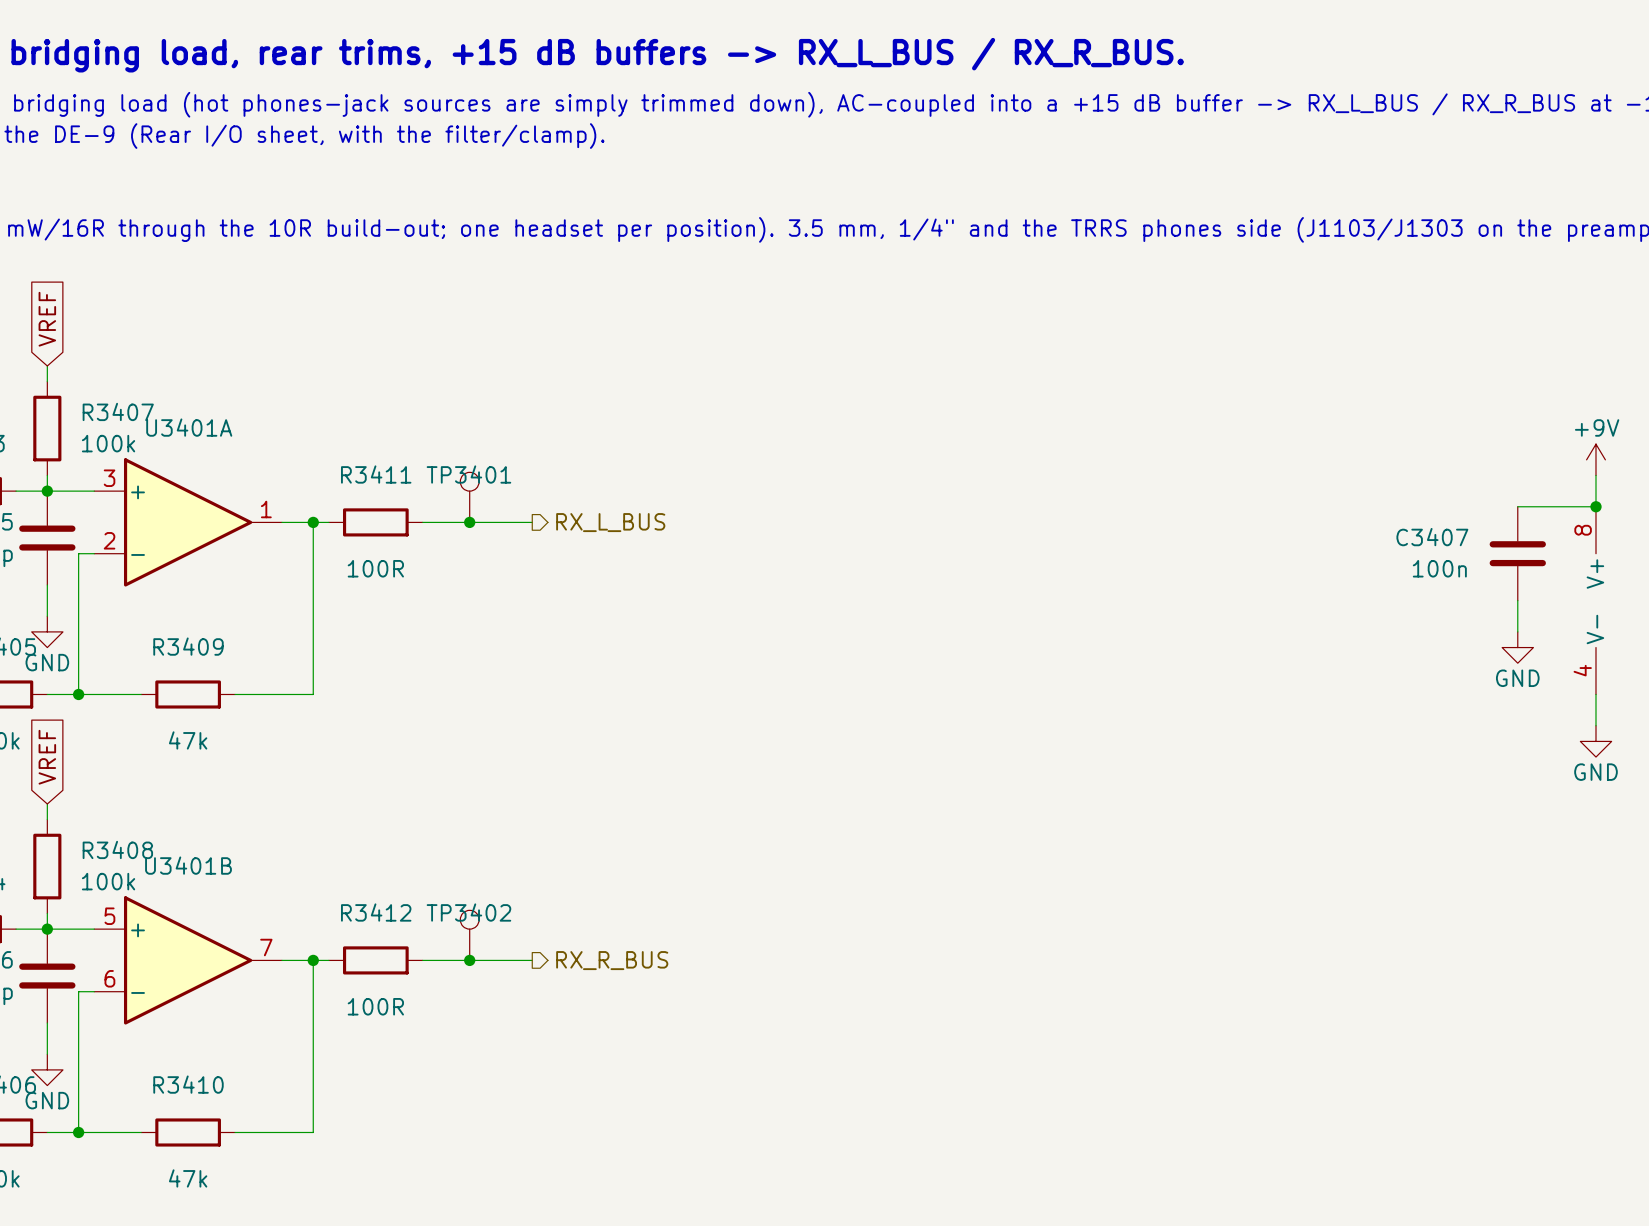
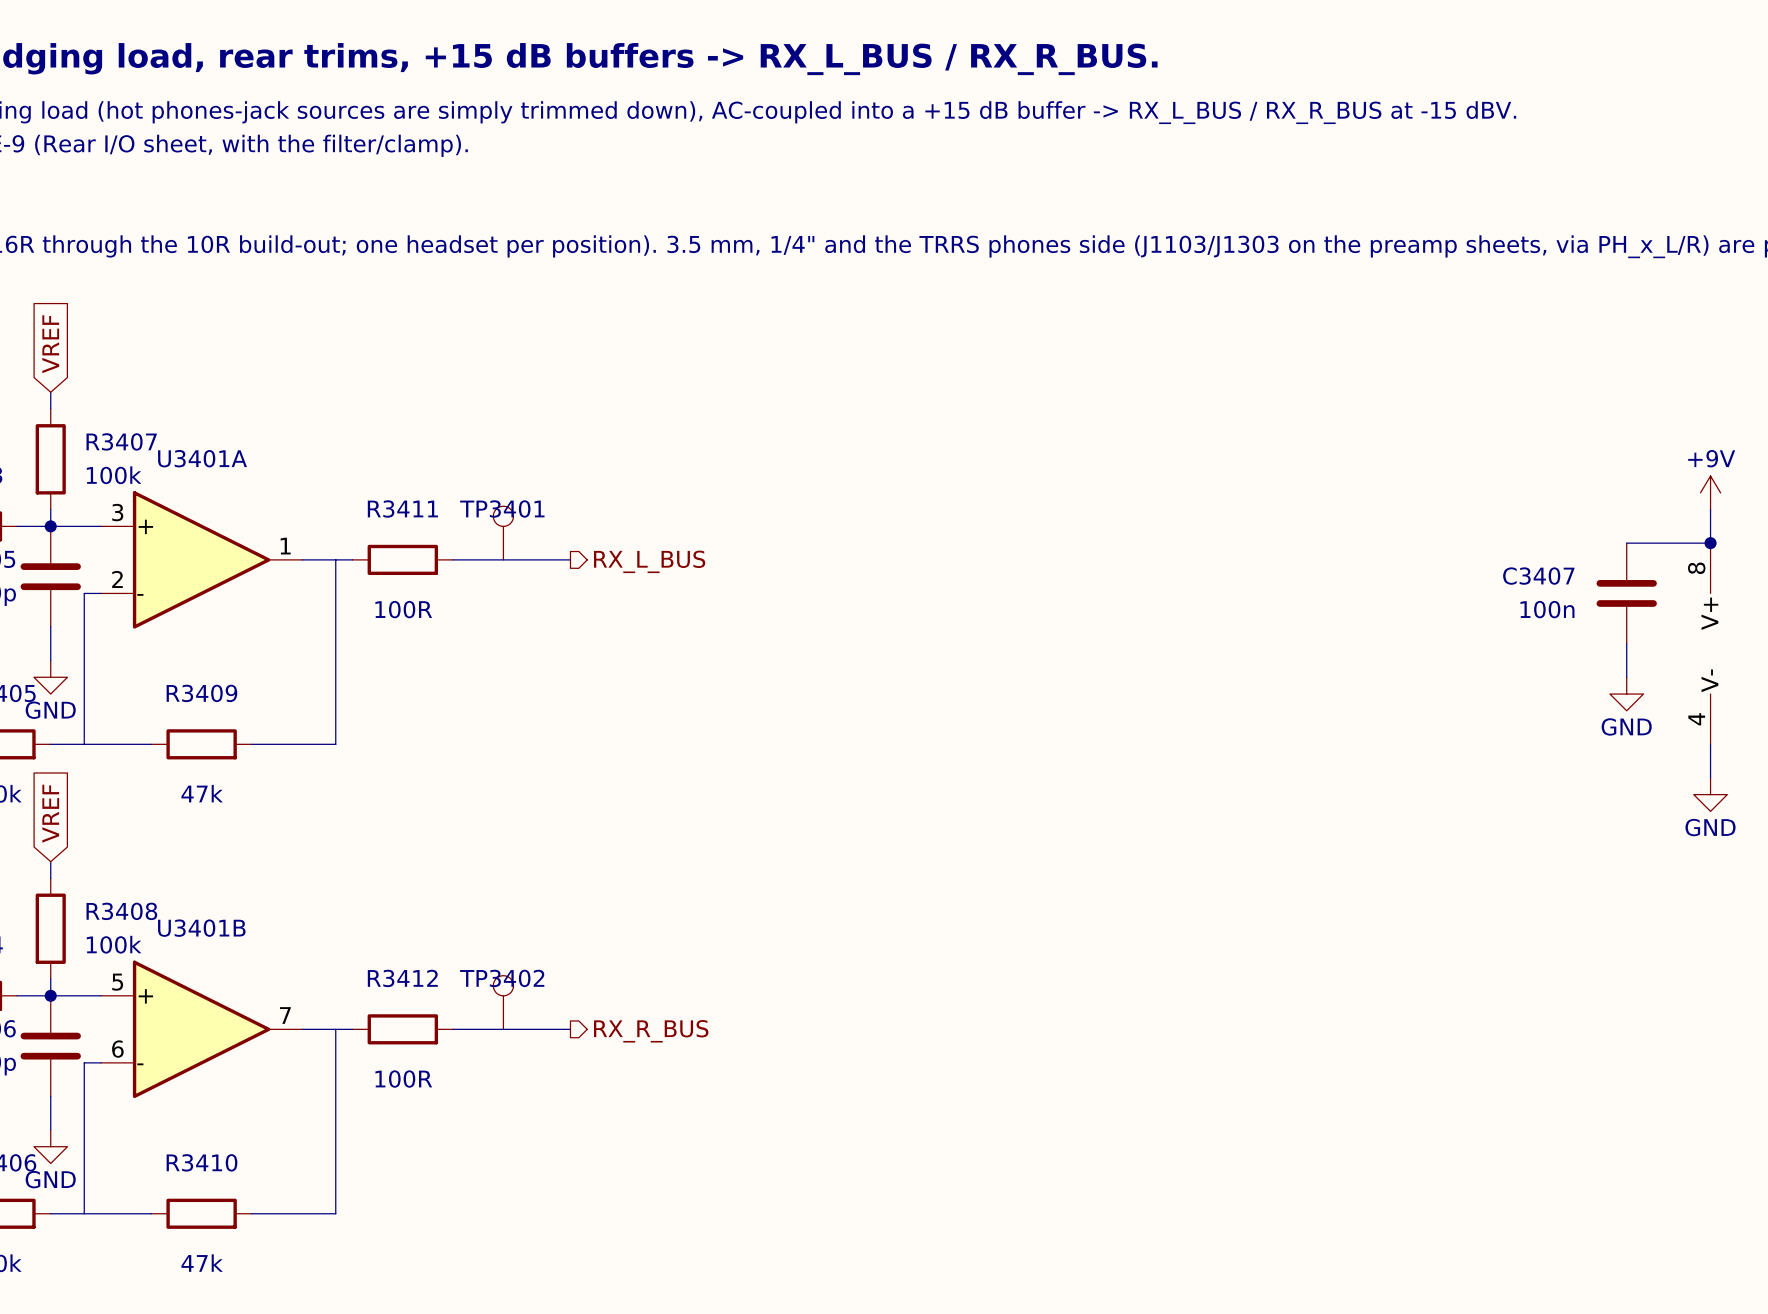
junction: (313, 522) -> none
junction: (469, 522) -> none
junction: (78, 694) -> none
junction: (313, 960) -> none
junction: (469, 960) -> none
junction: (78, 1132) -> none

